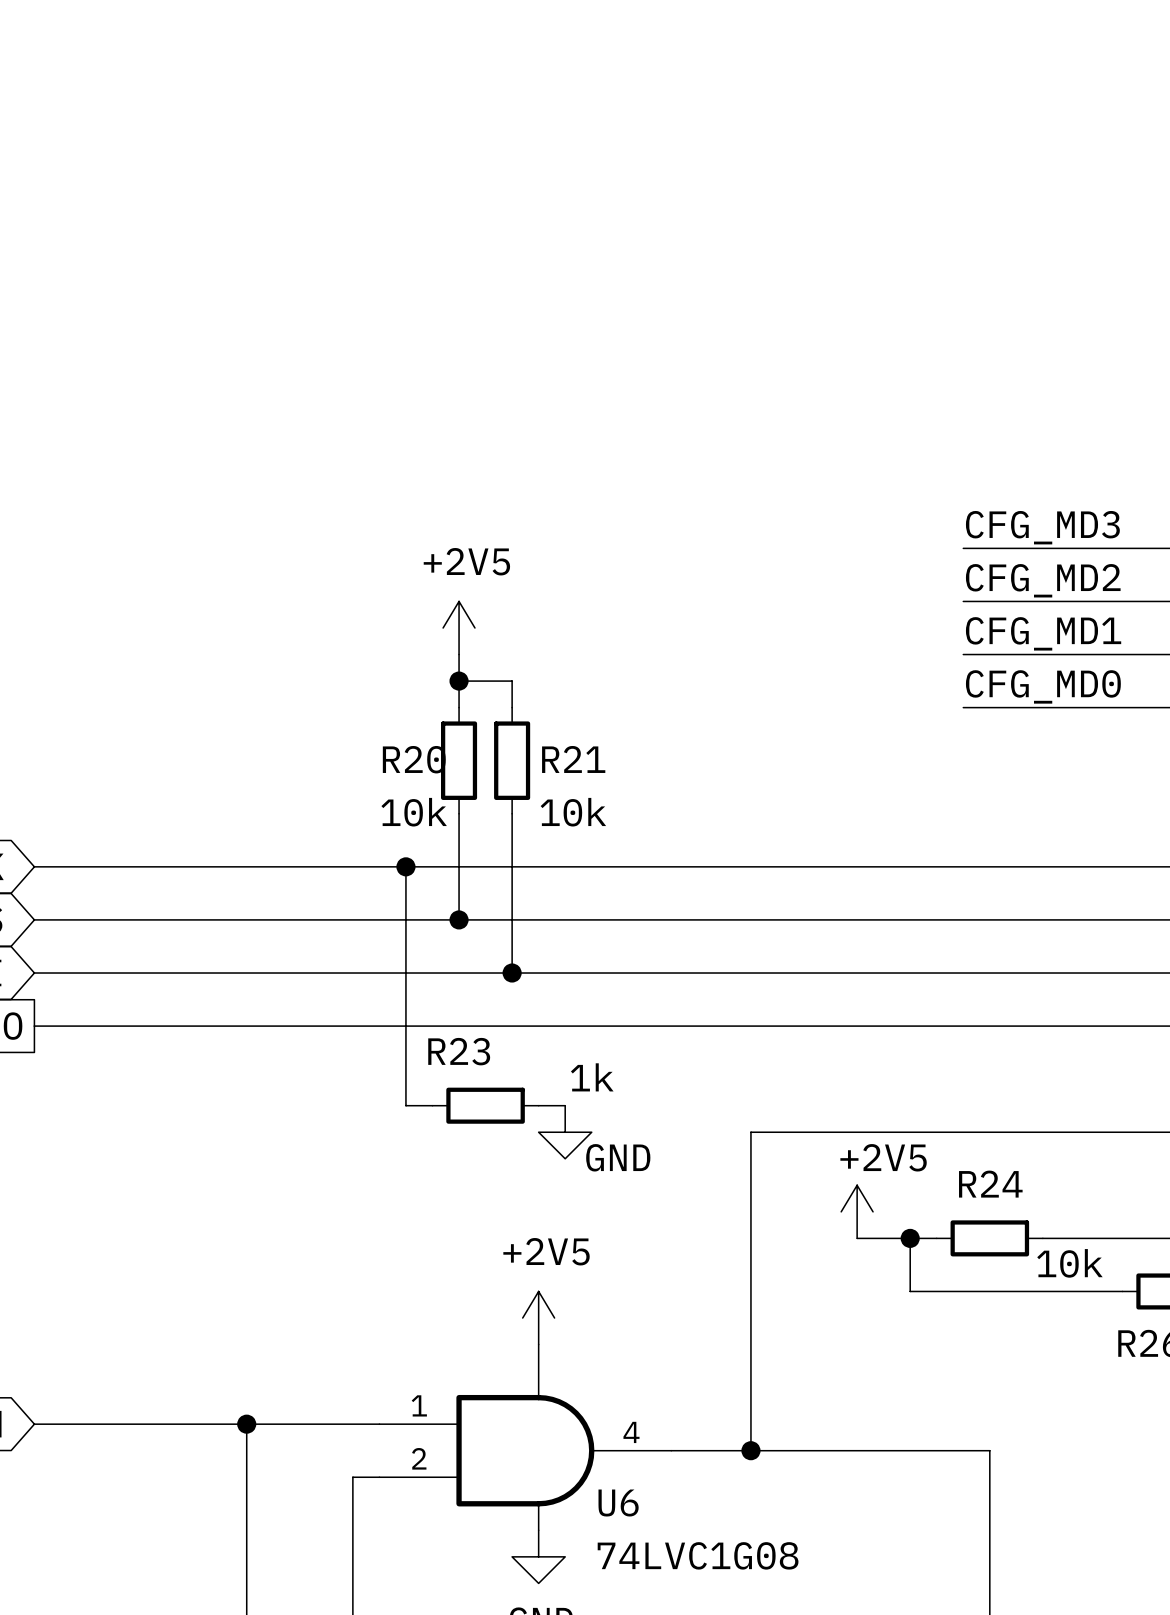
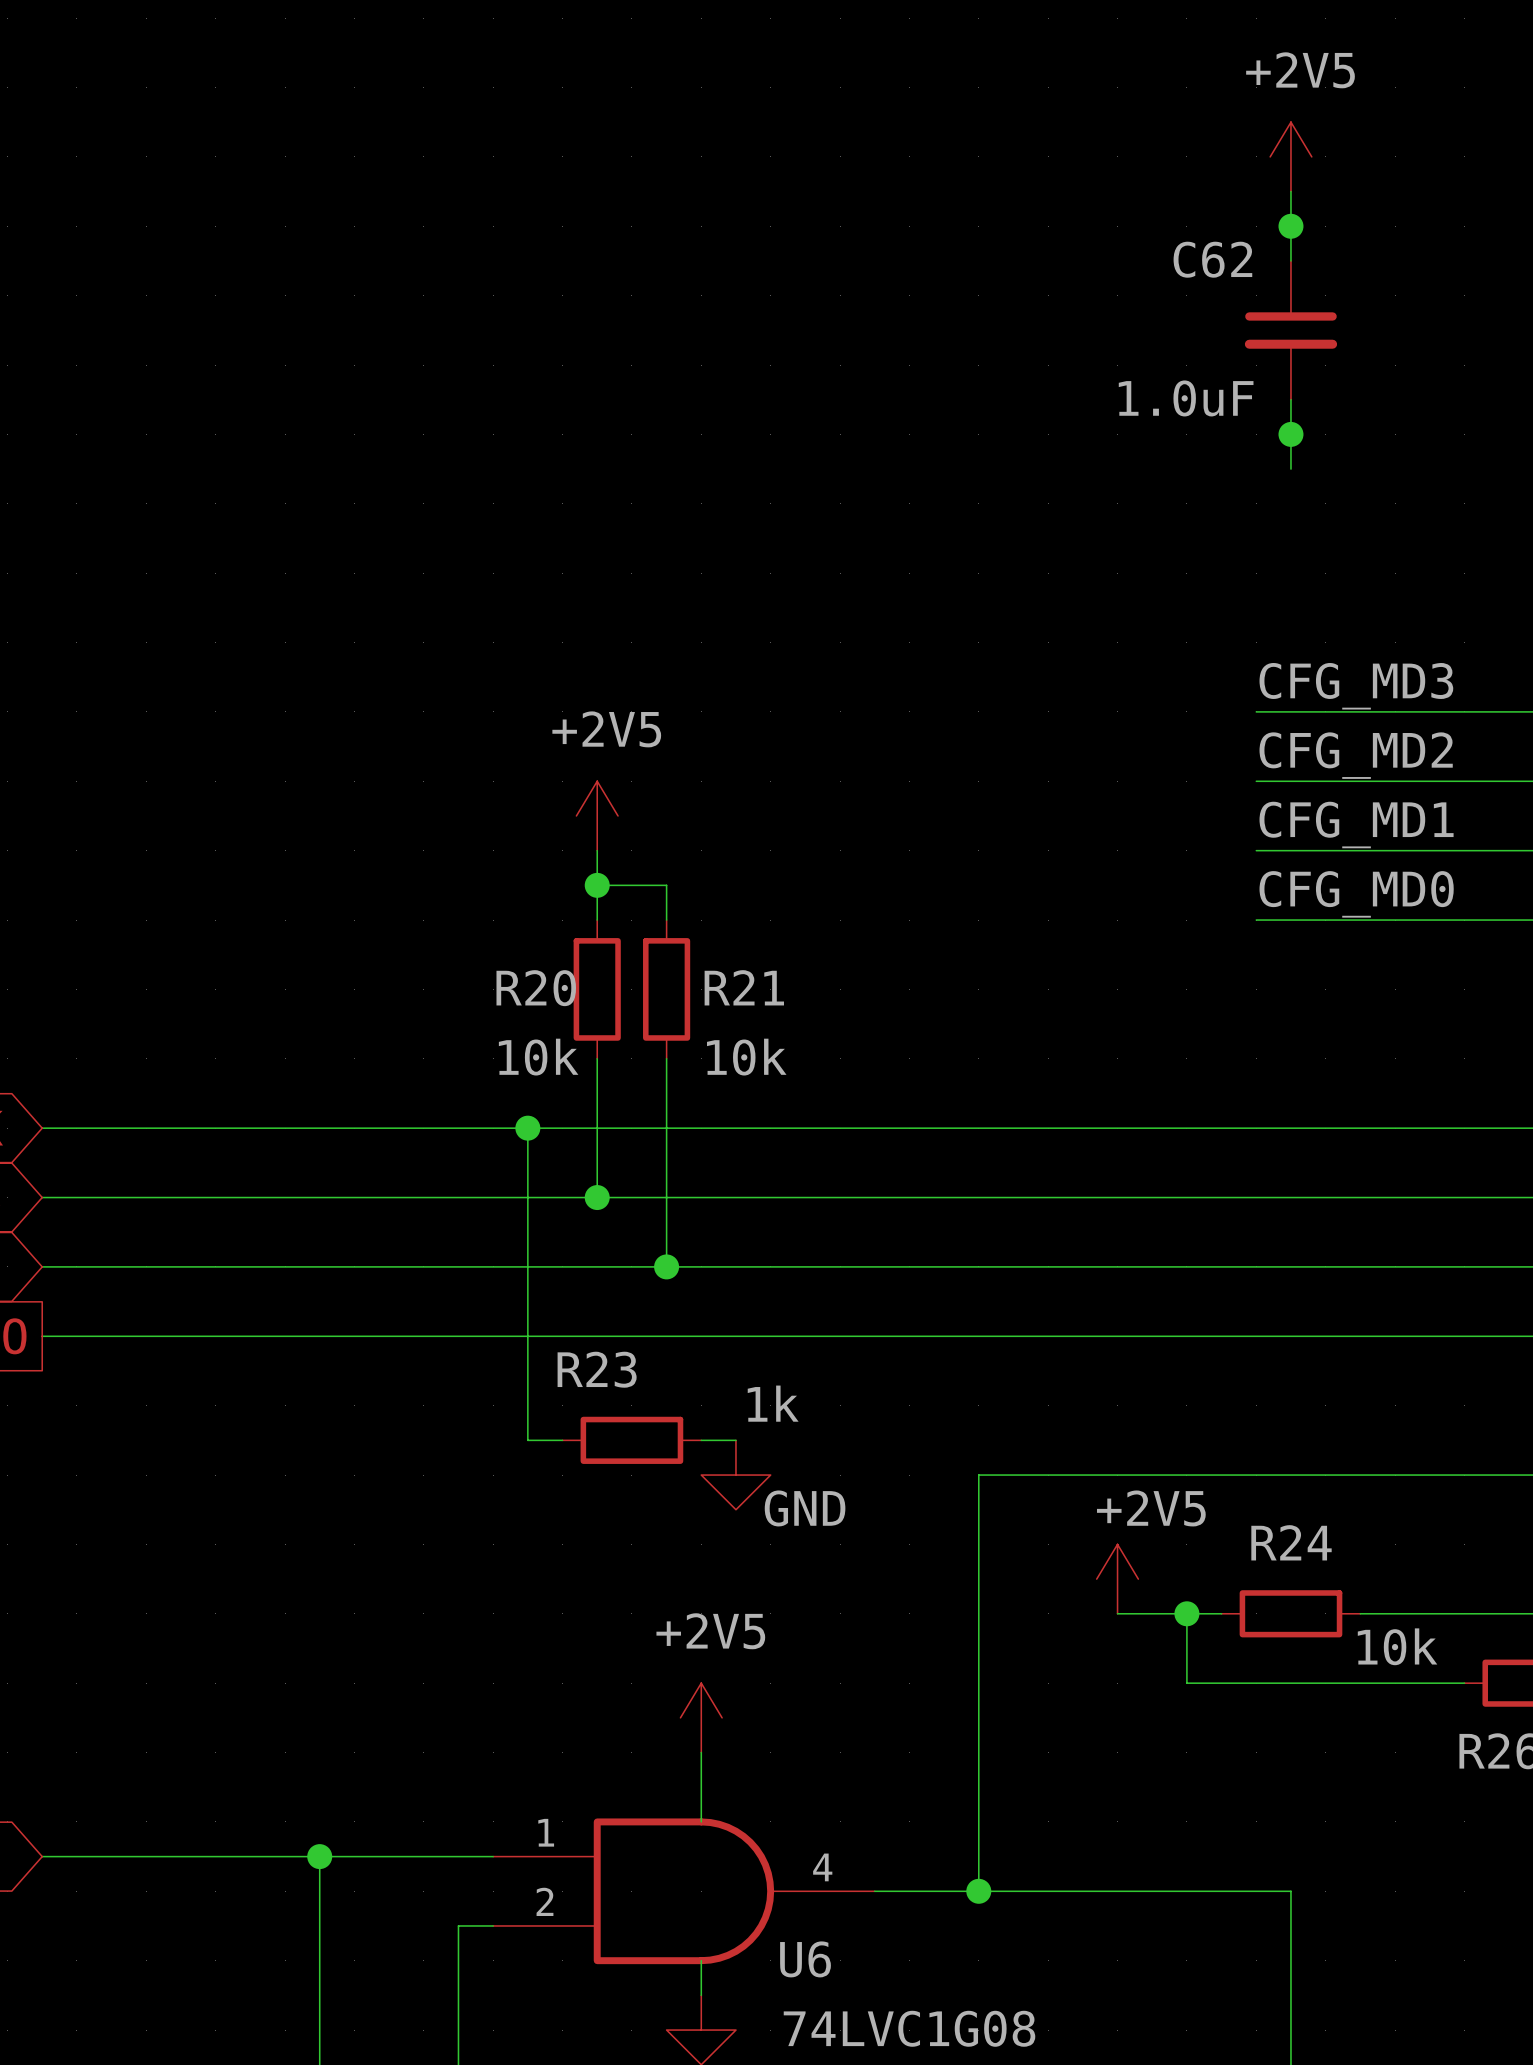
power symbol: none -> +2V5 (1290, 156)
wire: none -> (1290, 191) (1290, 260)
junction: none -> (1290, 226)
C62: none -> 1.0uF (1290, 330)
wire: none -> (1290, 399) (1290, 469)
junction: none -> (1290, 434)

